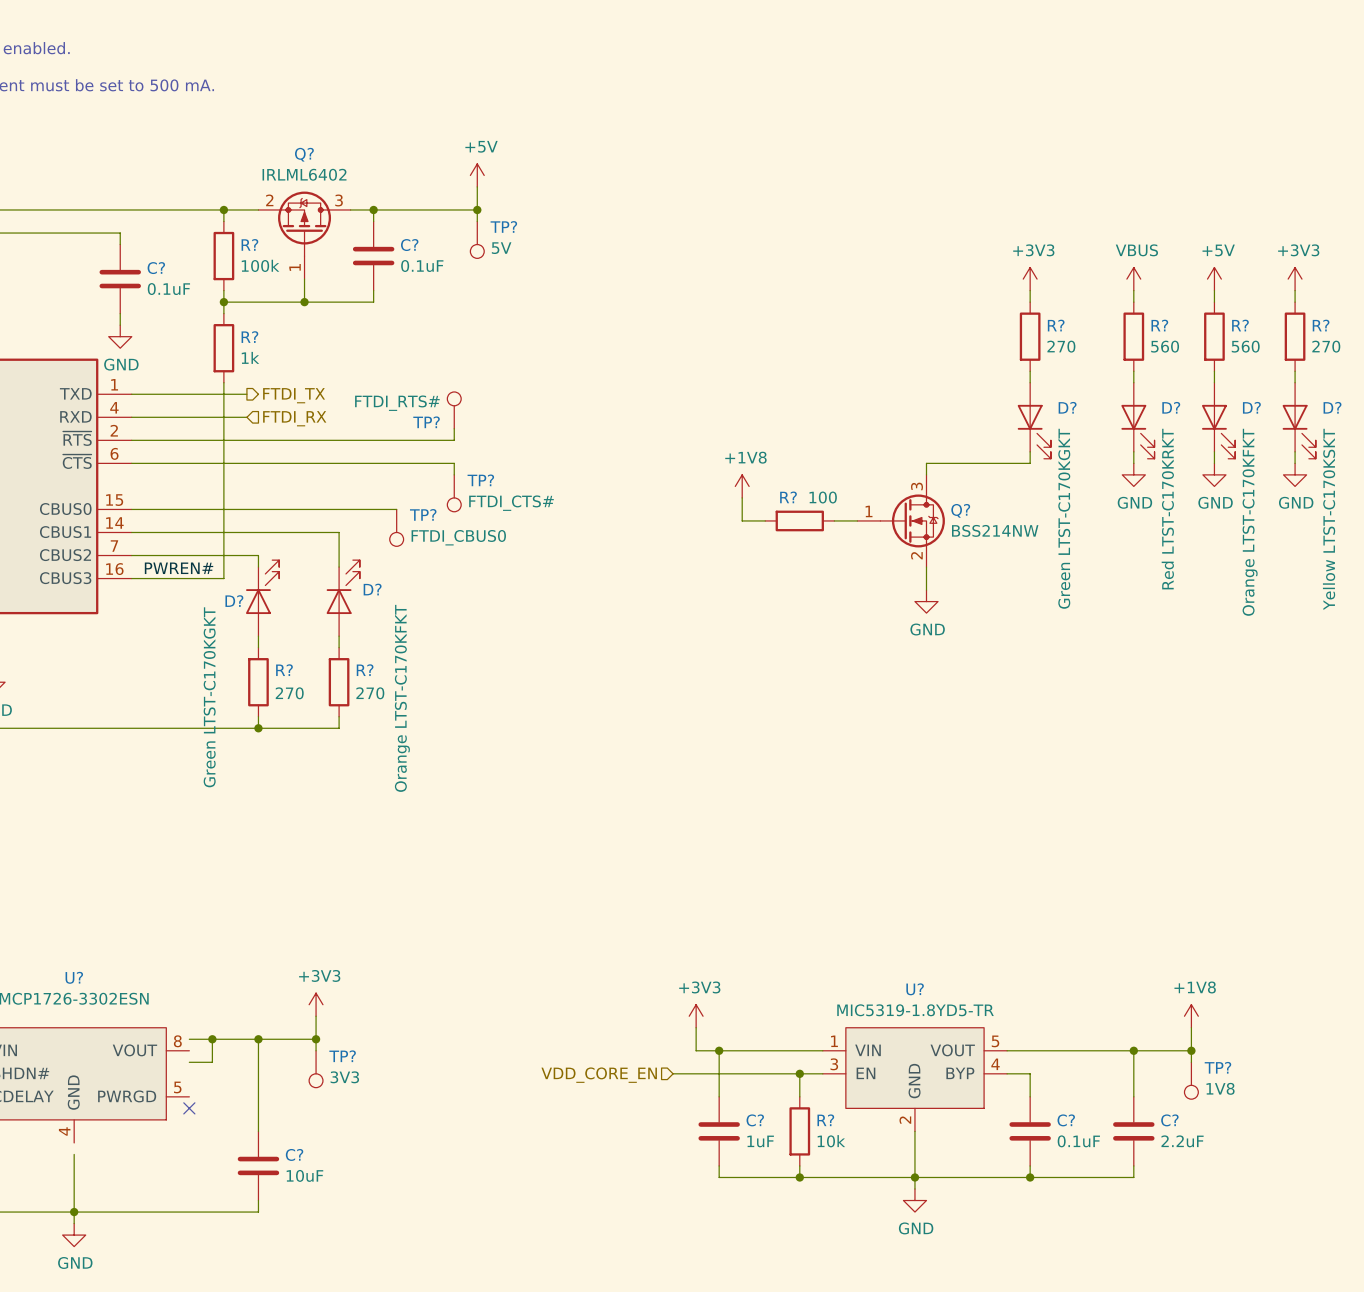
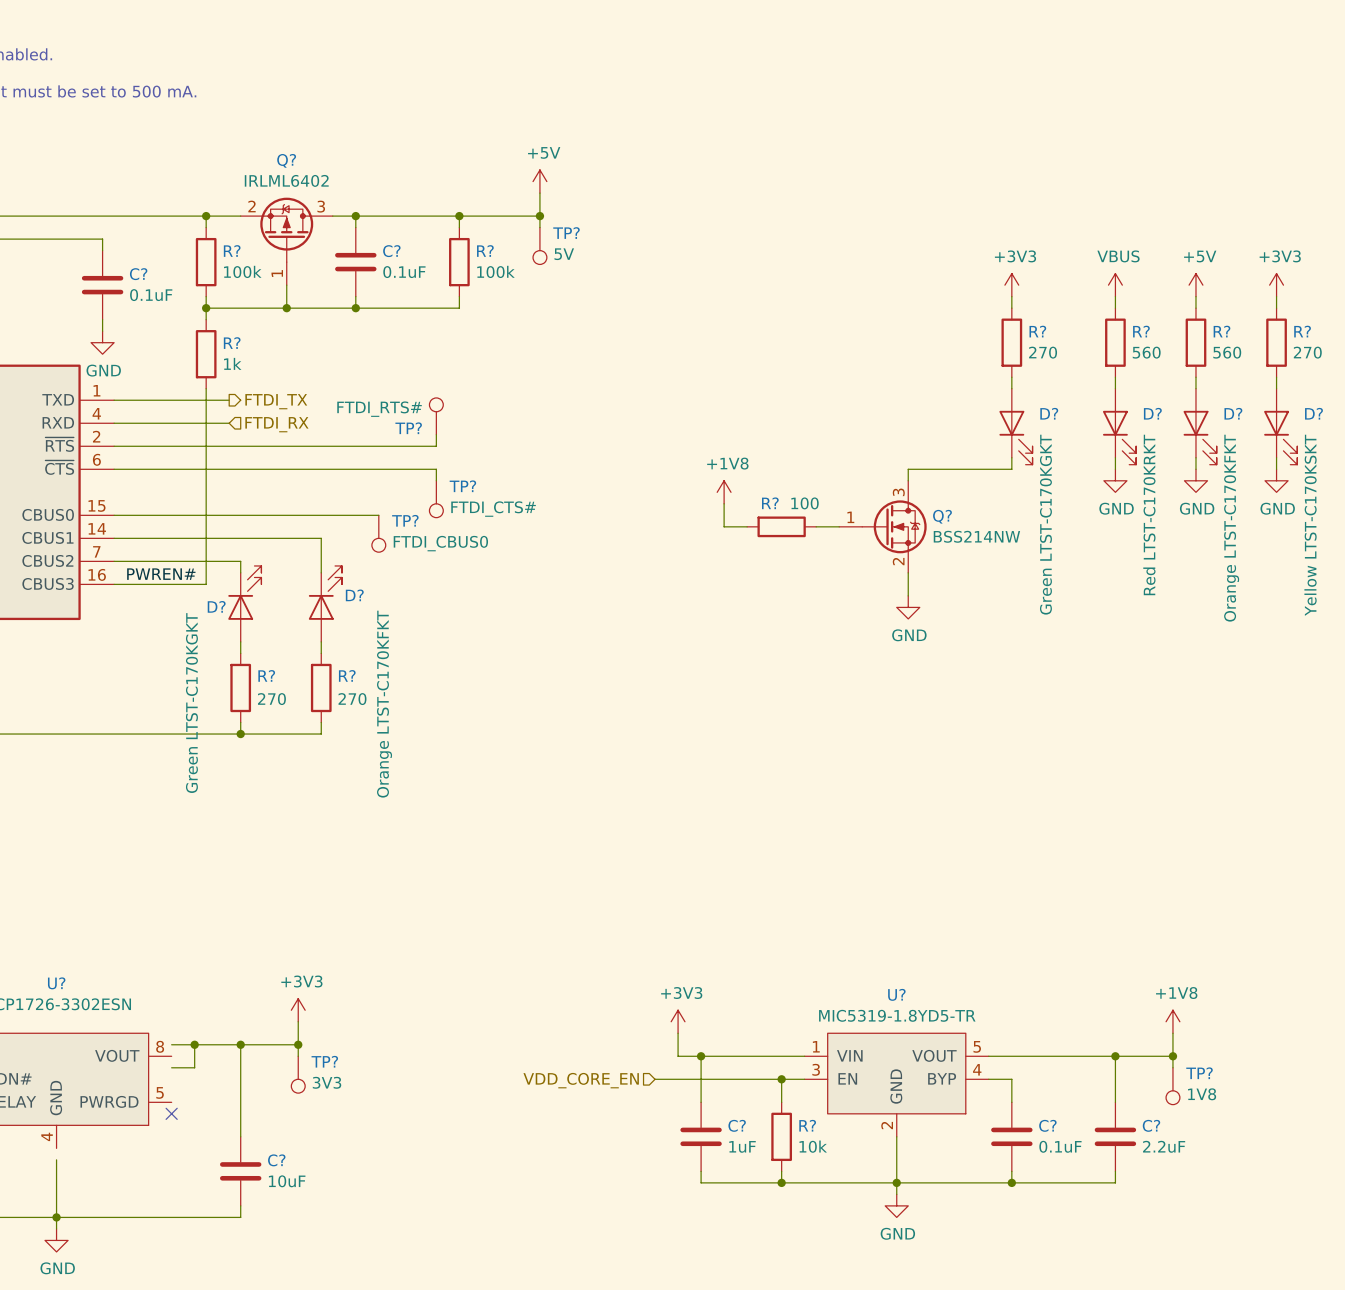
power symbol position: +5V (477, 175) -> +5V (539, 181)
wire: (477, 186) (477, 209) -> (539, 216) (459, 216)
wire: none -> (539, 193) (539, 227)
junction: none -> (539, 216)
TP? position: (477, 239) -> (539, 246)
R?: none -> 100k (459, 262)
wire: none -> (459, 296) (459, 308) (355, 308)
junction: none -> (355, 308)

